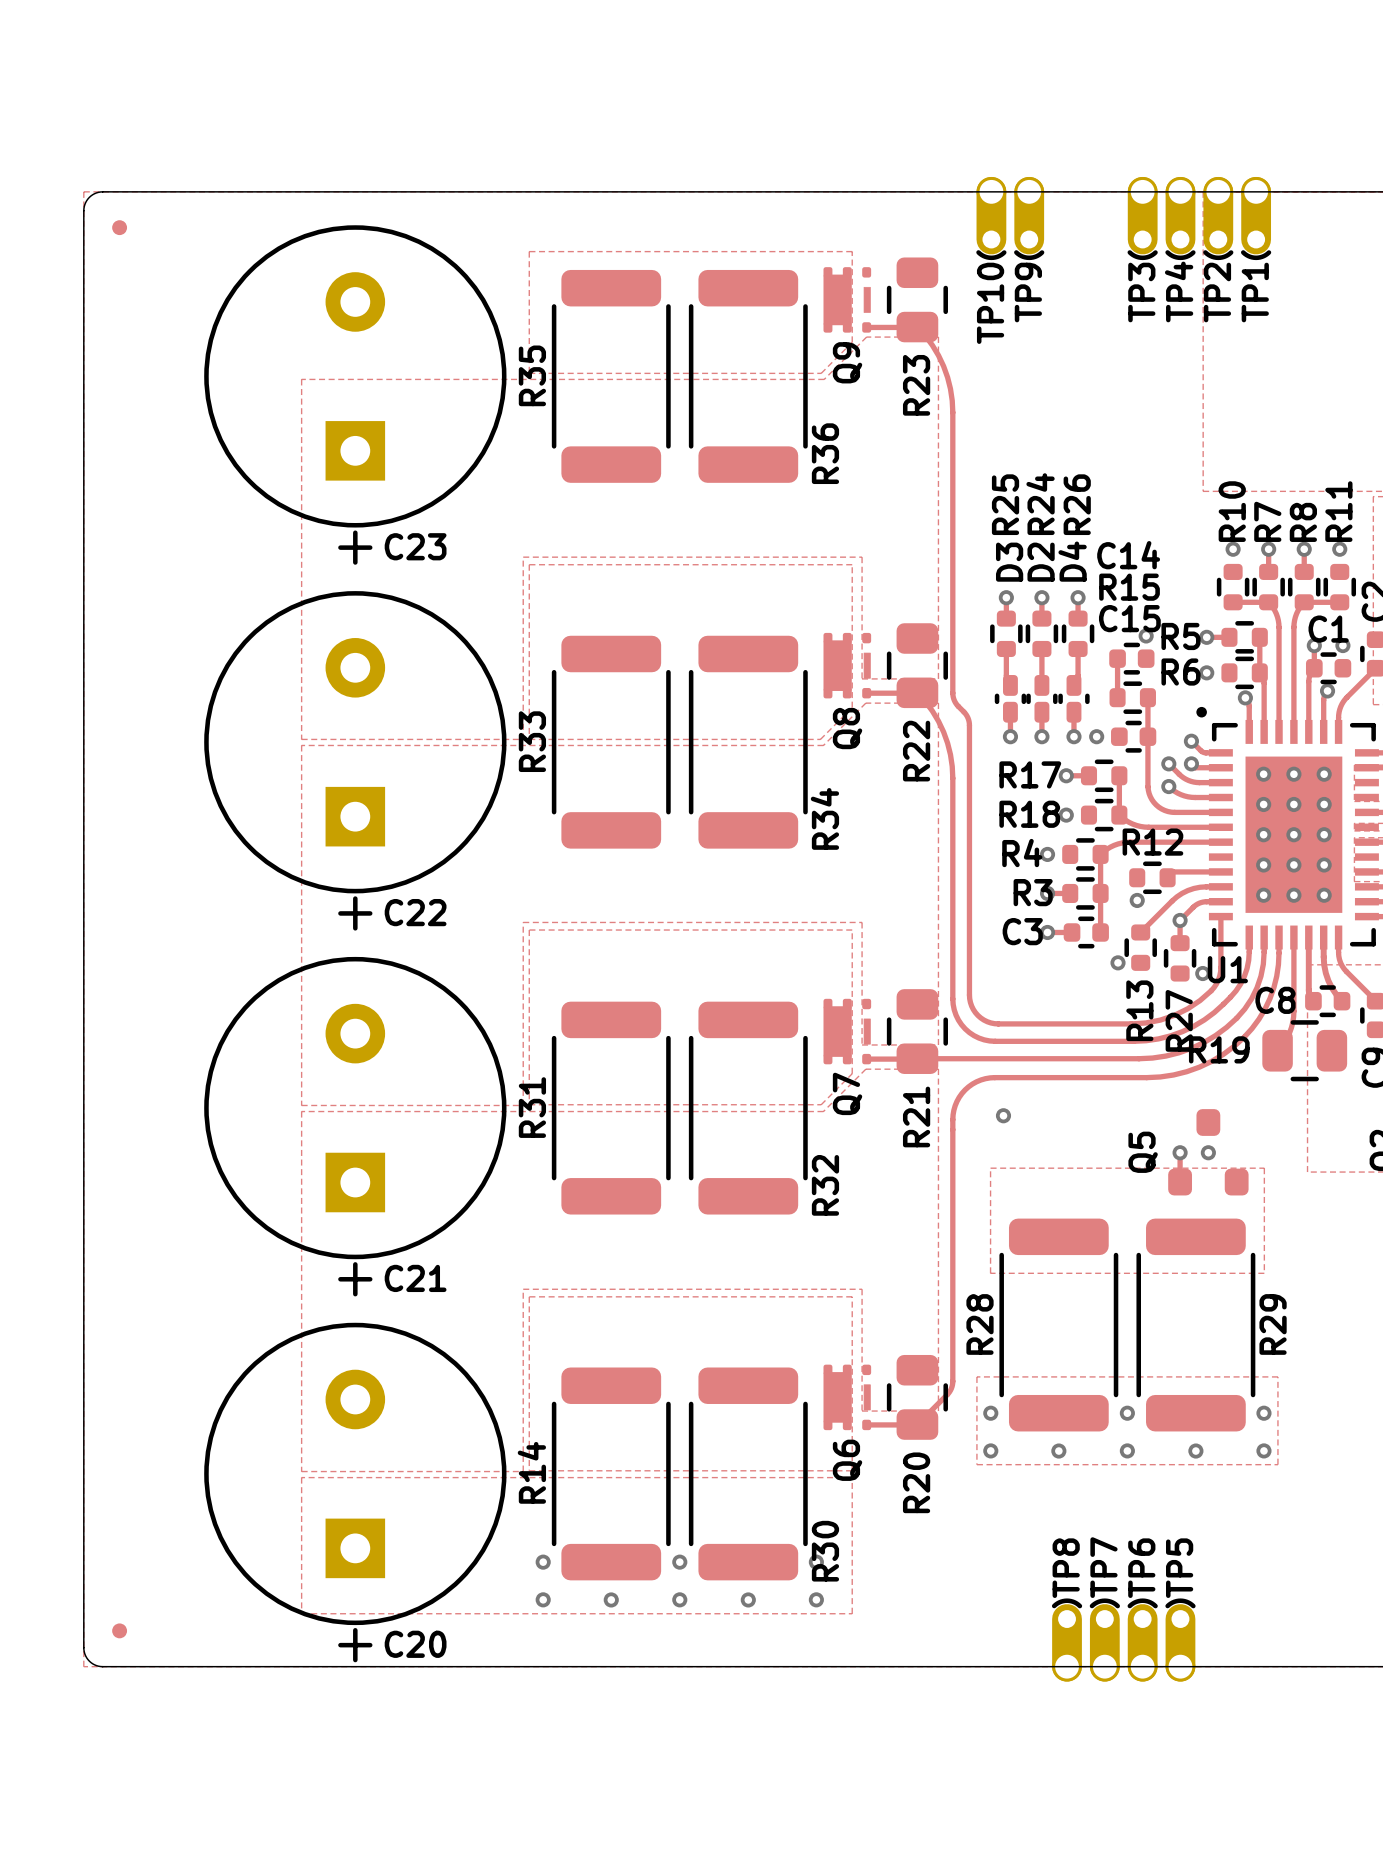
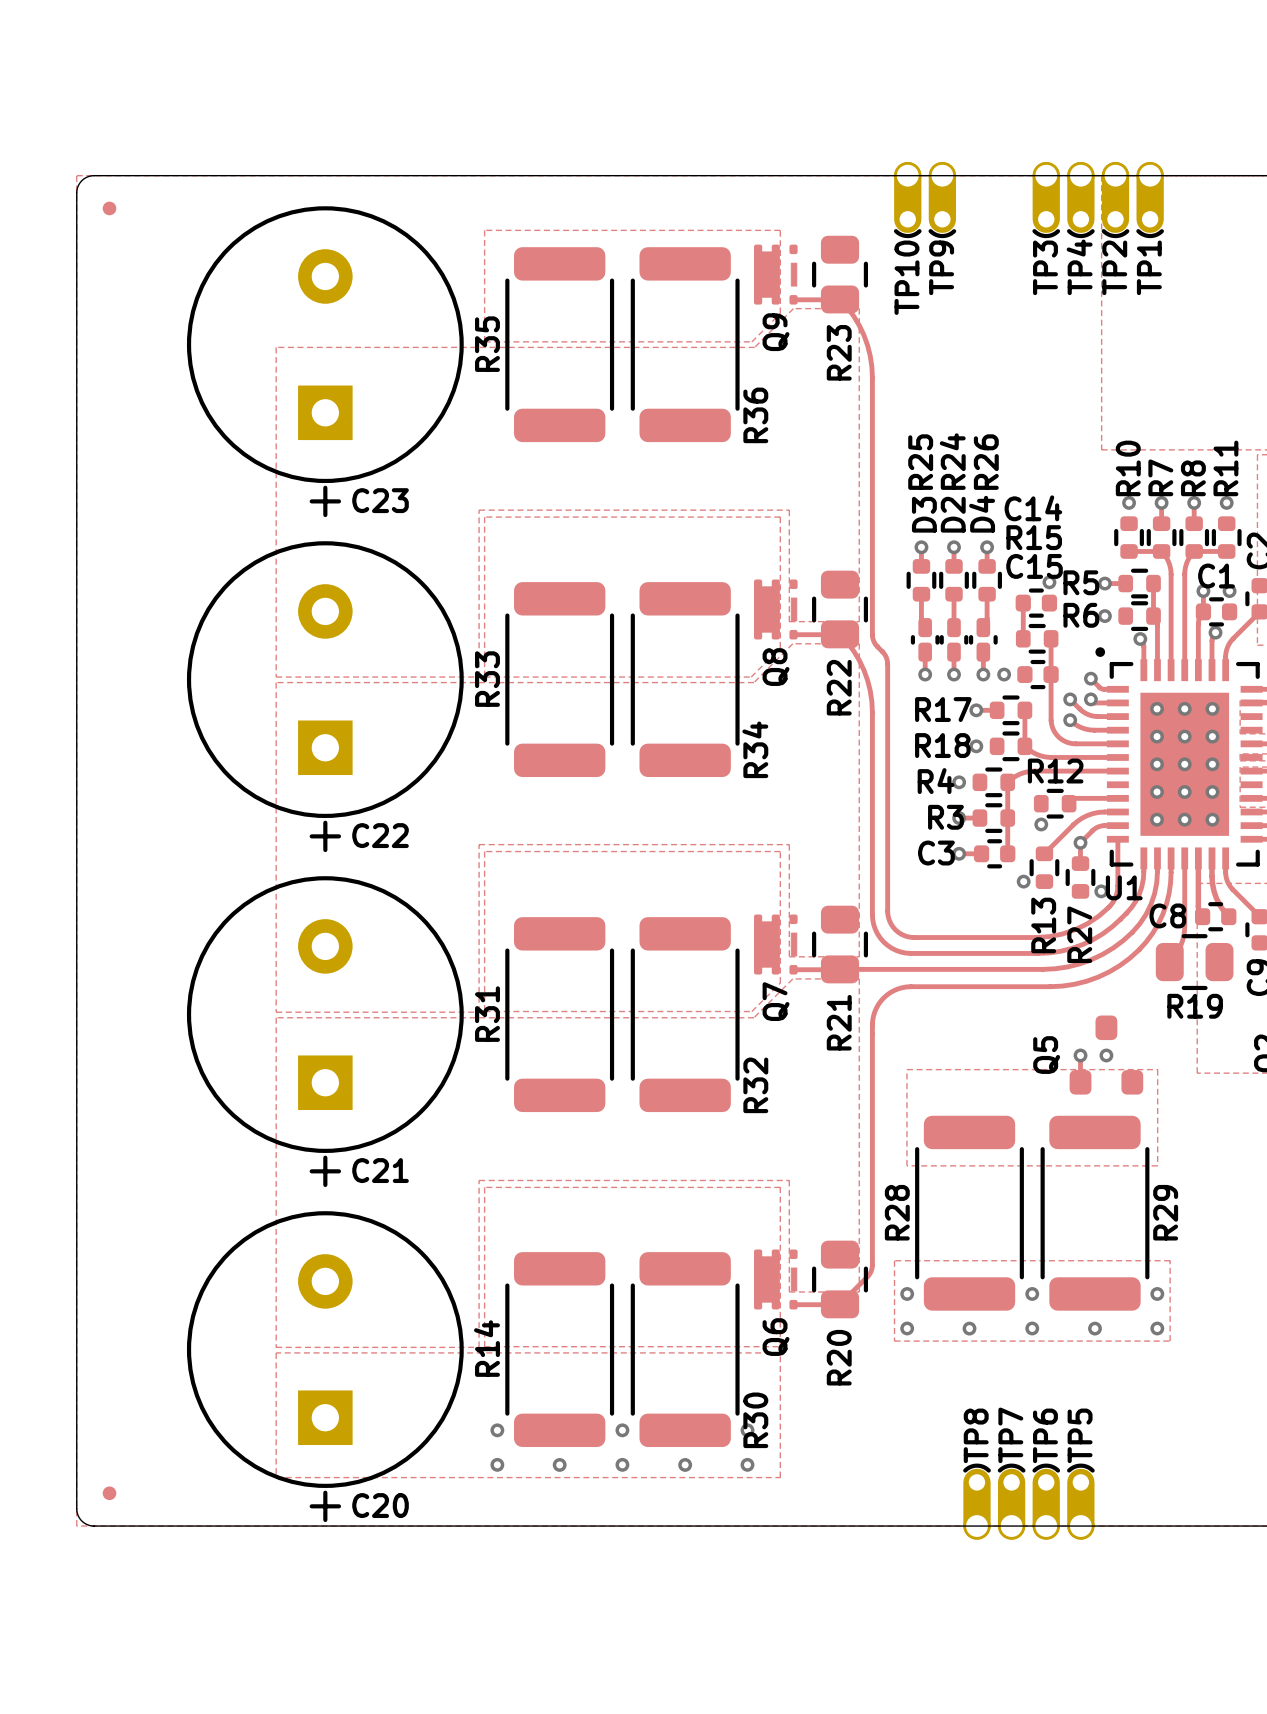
R19 name position: R19 (1219, 1049) -> R19 (1195, 1006)
via: (1003, 1115) -> none

